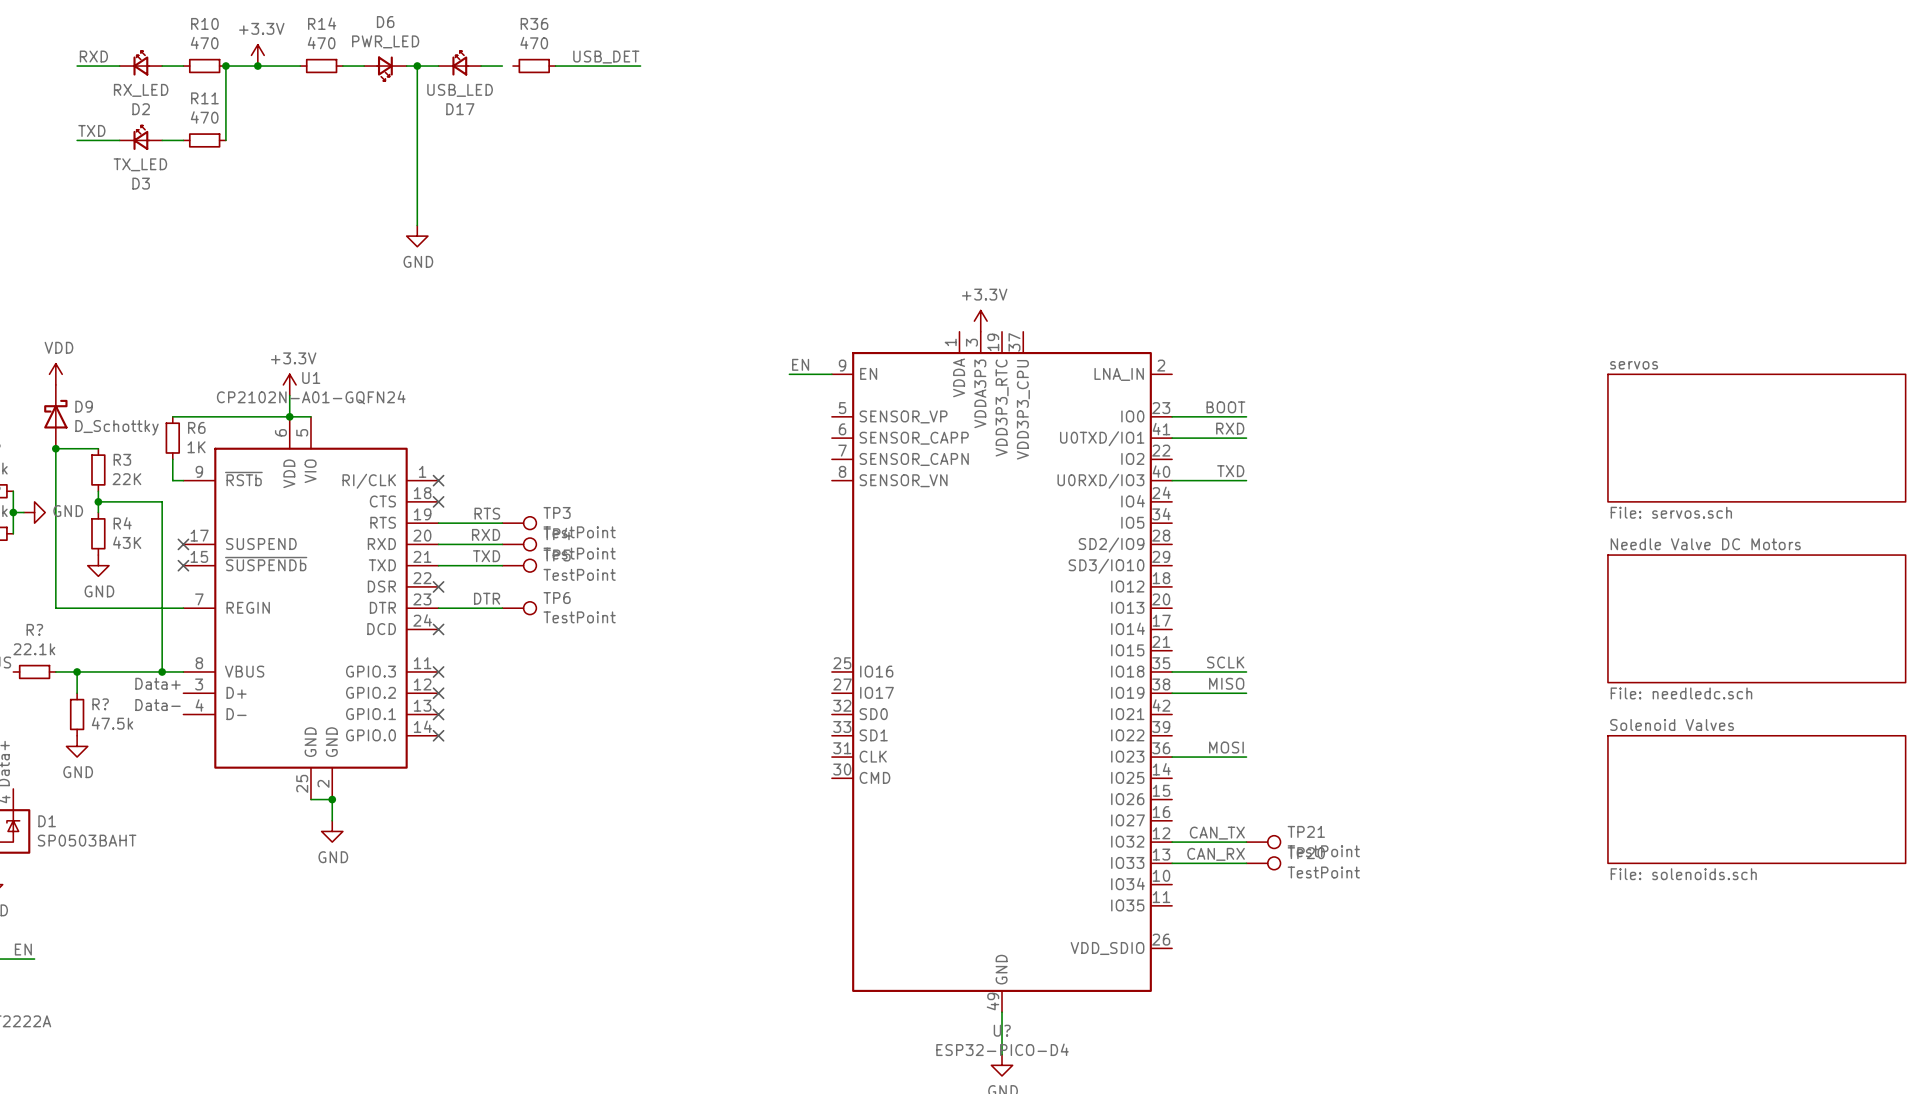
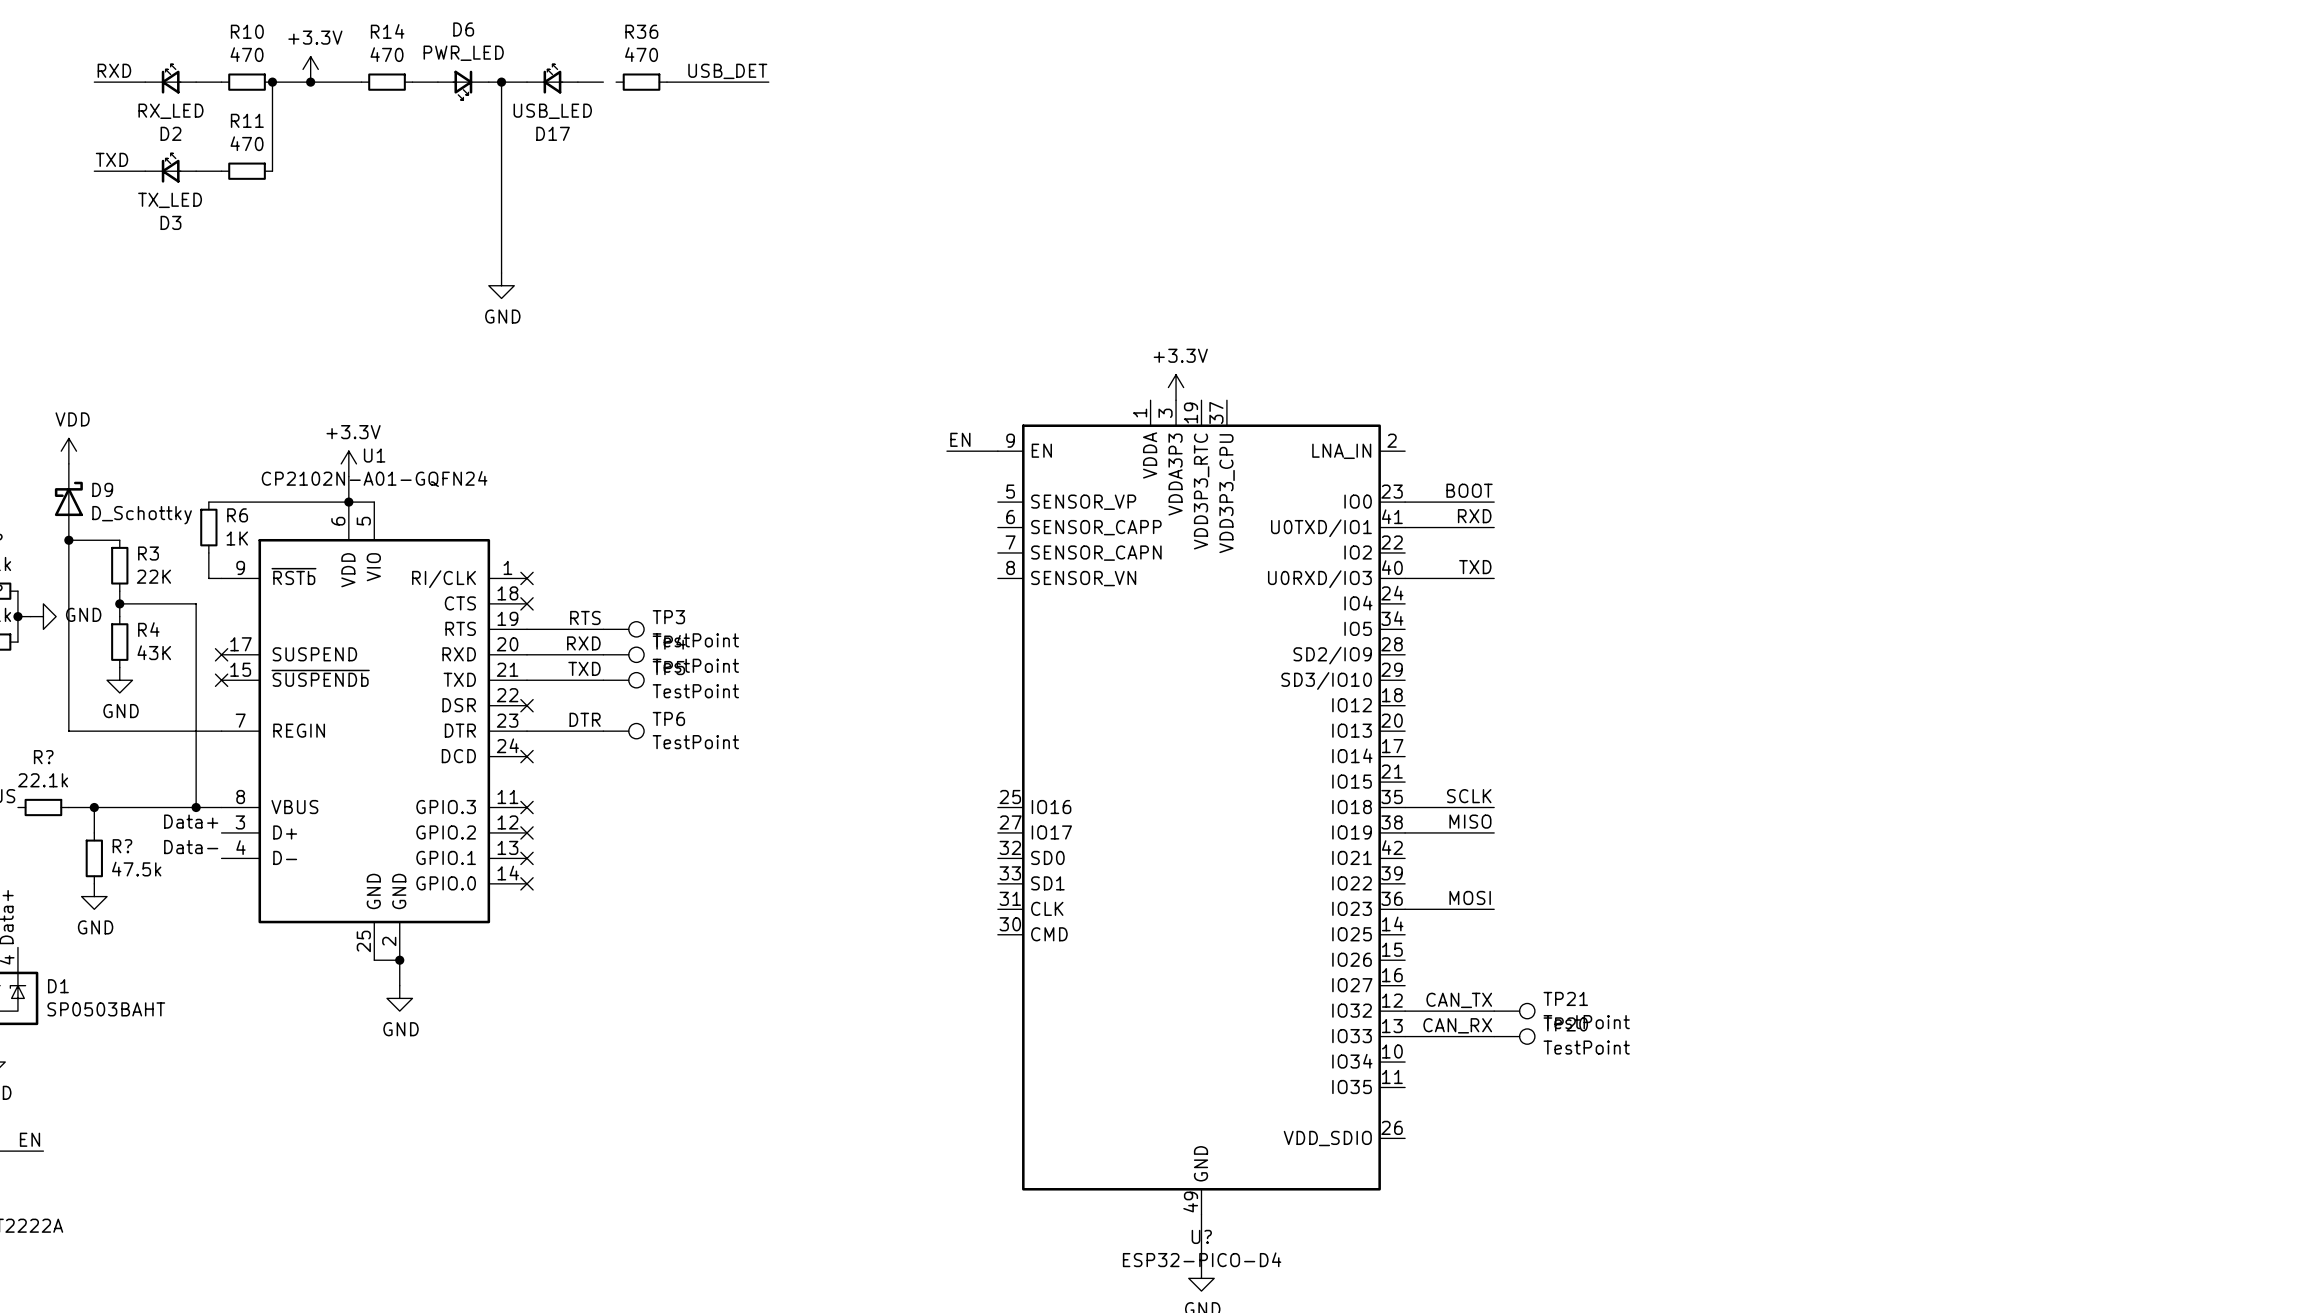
sheet servos: File: servos.sch (1756, 438) -> none
sheet Needle Valve DC Motors: File: needledc.sch (1756, 618) -> none
sheet Solenoid Valves: File: solenoids.sch (1756, 799) -> none

